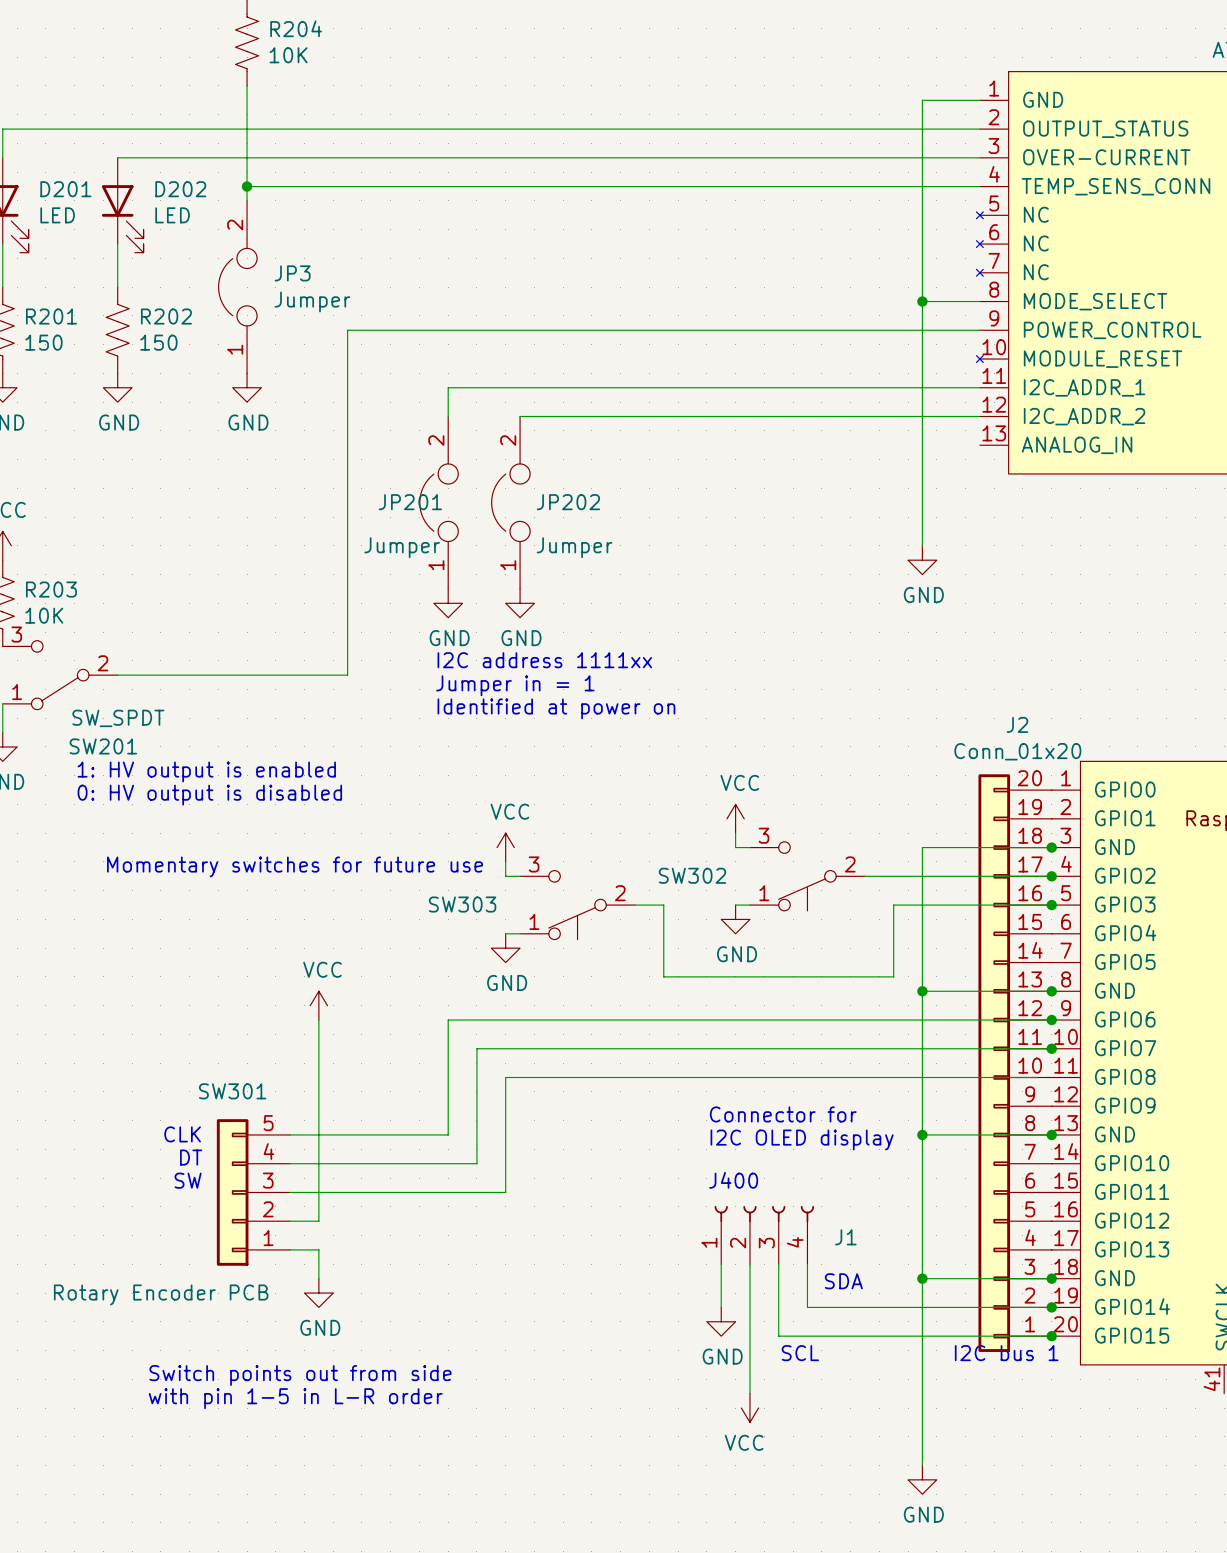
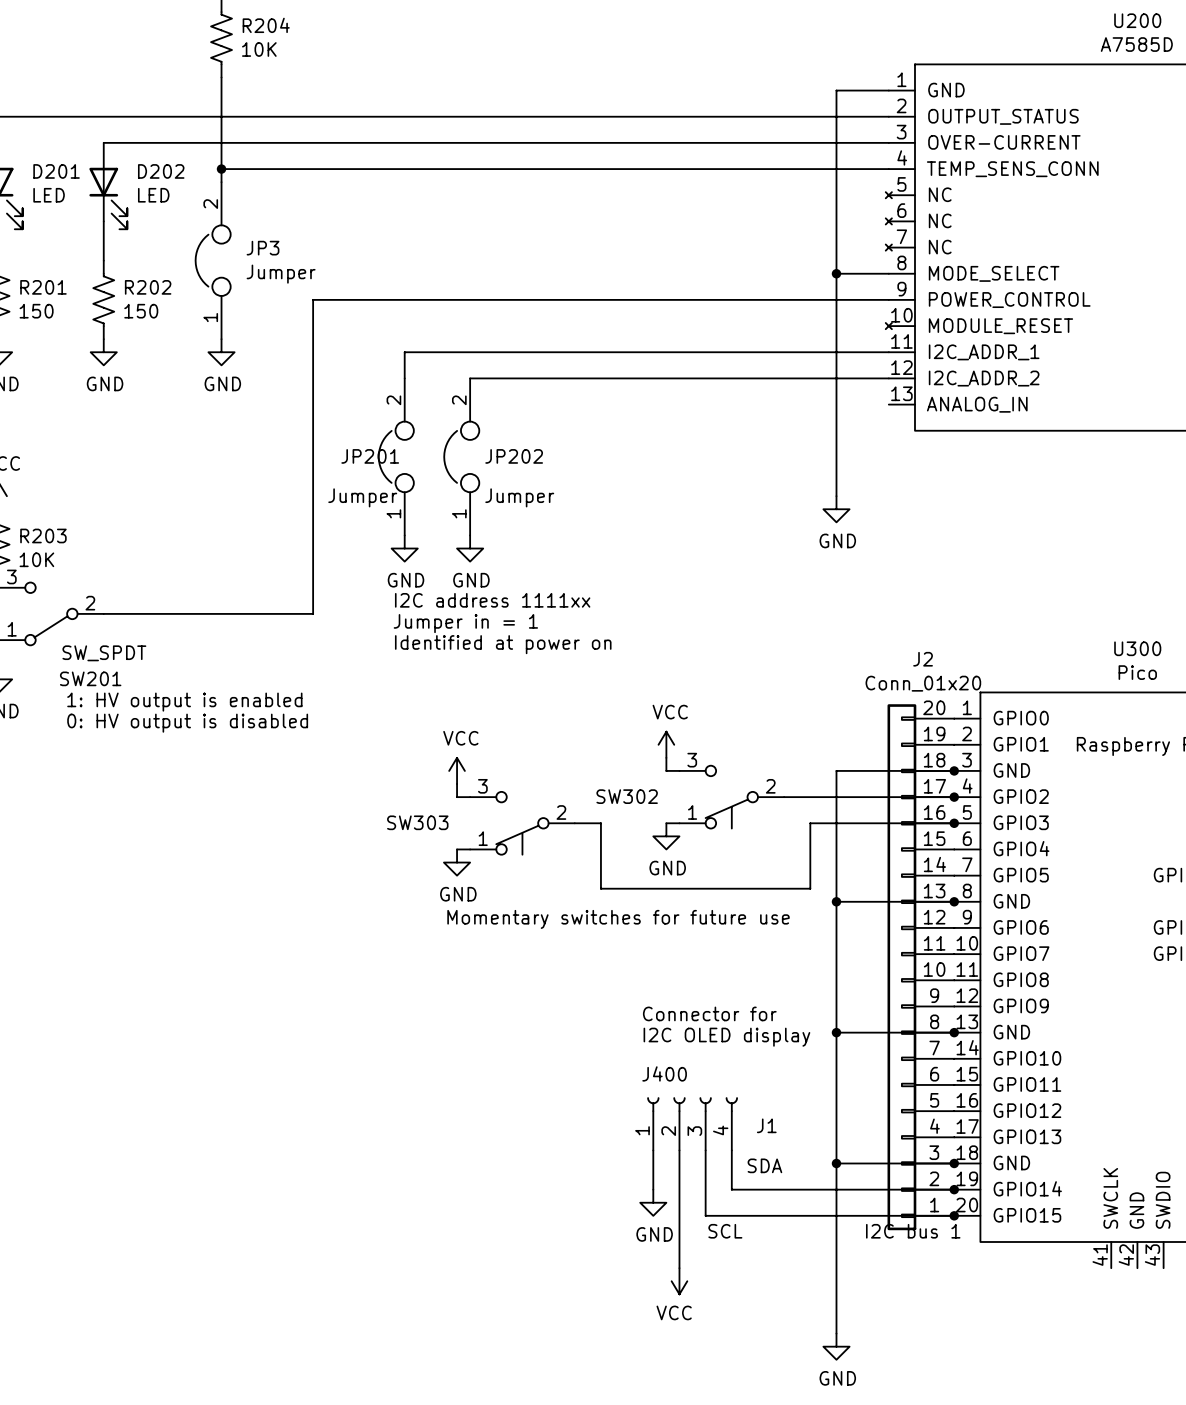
text: Momentary switches for future use (295, 866) -> none
power symbol: VCC (318, 1005) -> none
text: none -> Momentary switches for future use (618, 919)
wire: (318, 1020) (318, 1221) (290, 1221) -> none
wire: (1051, 1020) (448, 1020) (448, 1134) (290, 1134) -> none
junction: (1051, 1020) -> none
wire: (1051, 1048) (476, 1048) (476, 1163) (290, 1163) -> none
junction: (1051, 1048) -> none
wire: (1037, 1077) (505, 1077) (505, 1192) (290, 1192) -> none
text: CLK (182, 1134) -> none
text: DT (191, 1157) -> none
text: SW (188, 1180) -> none
SW301: Rotary Encoder PCB (253, 1192) -> none
wire: (290, 1249) (318, 1249) (318, 1278) -> none
power symbol: GND (318, 1293) -> none
text: Switch points out from side (300, 1375) -> none
text: with pin 1-5 in L-R order (295, 1398) -> none

